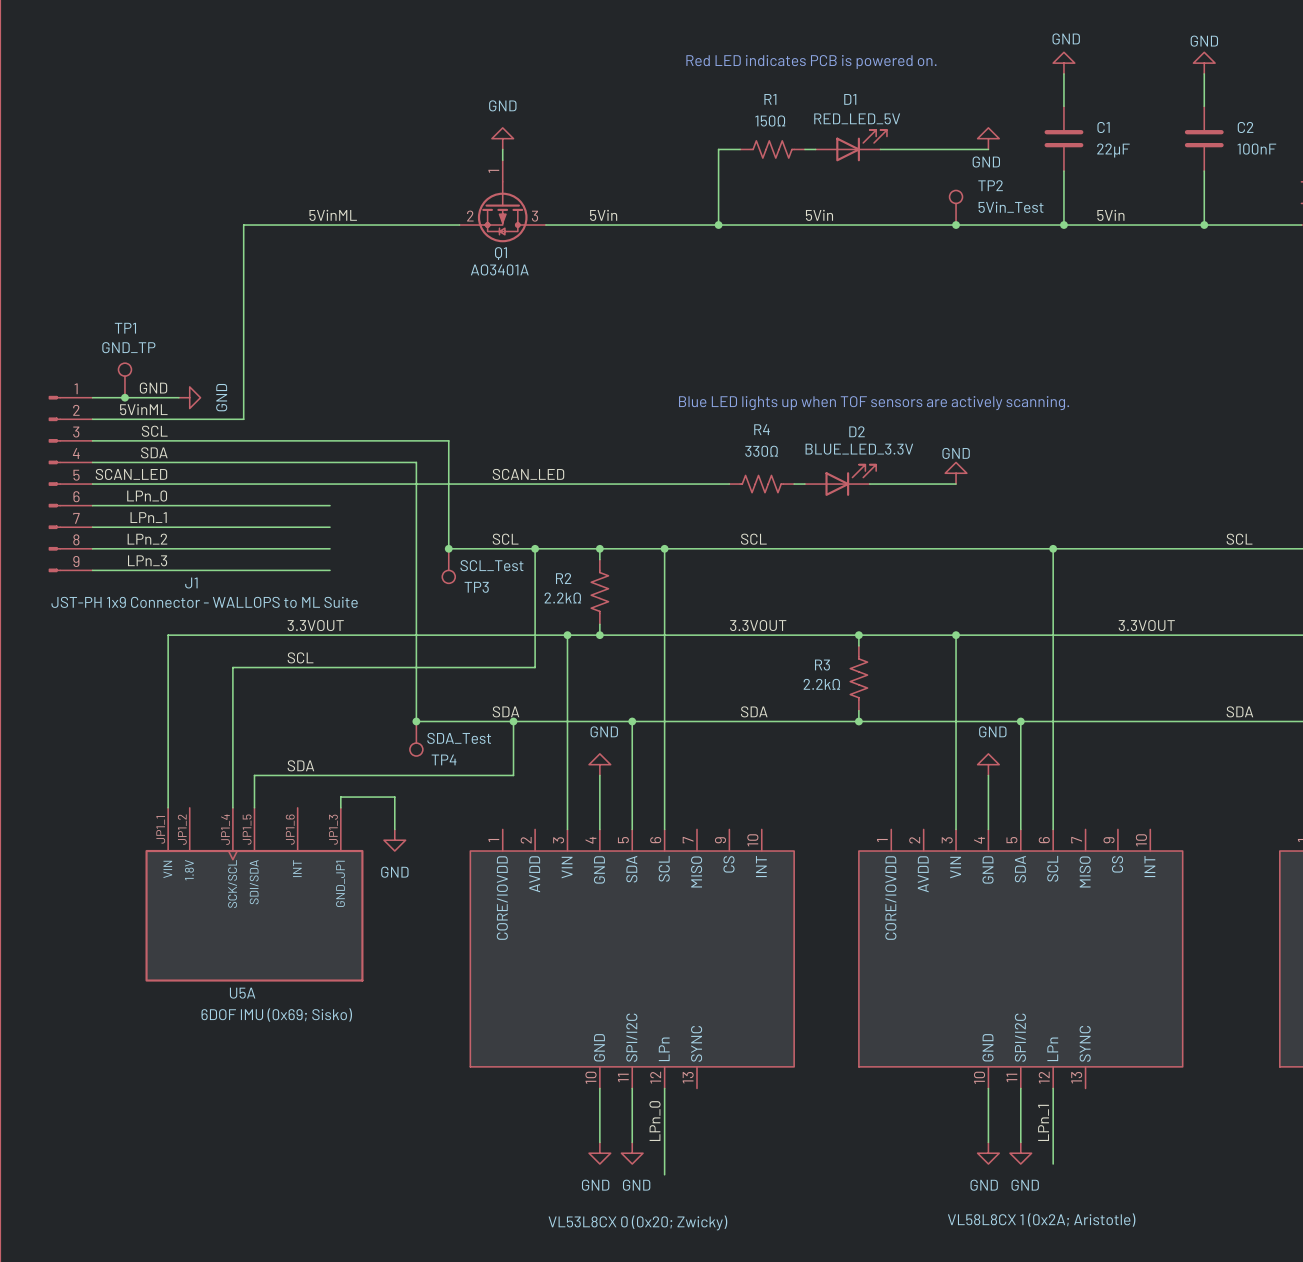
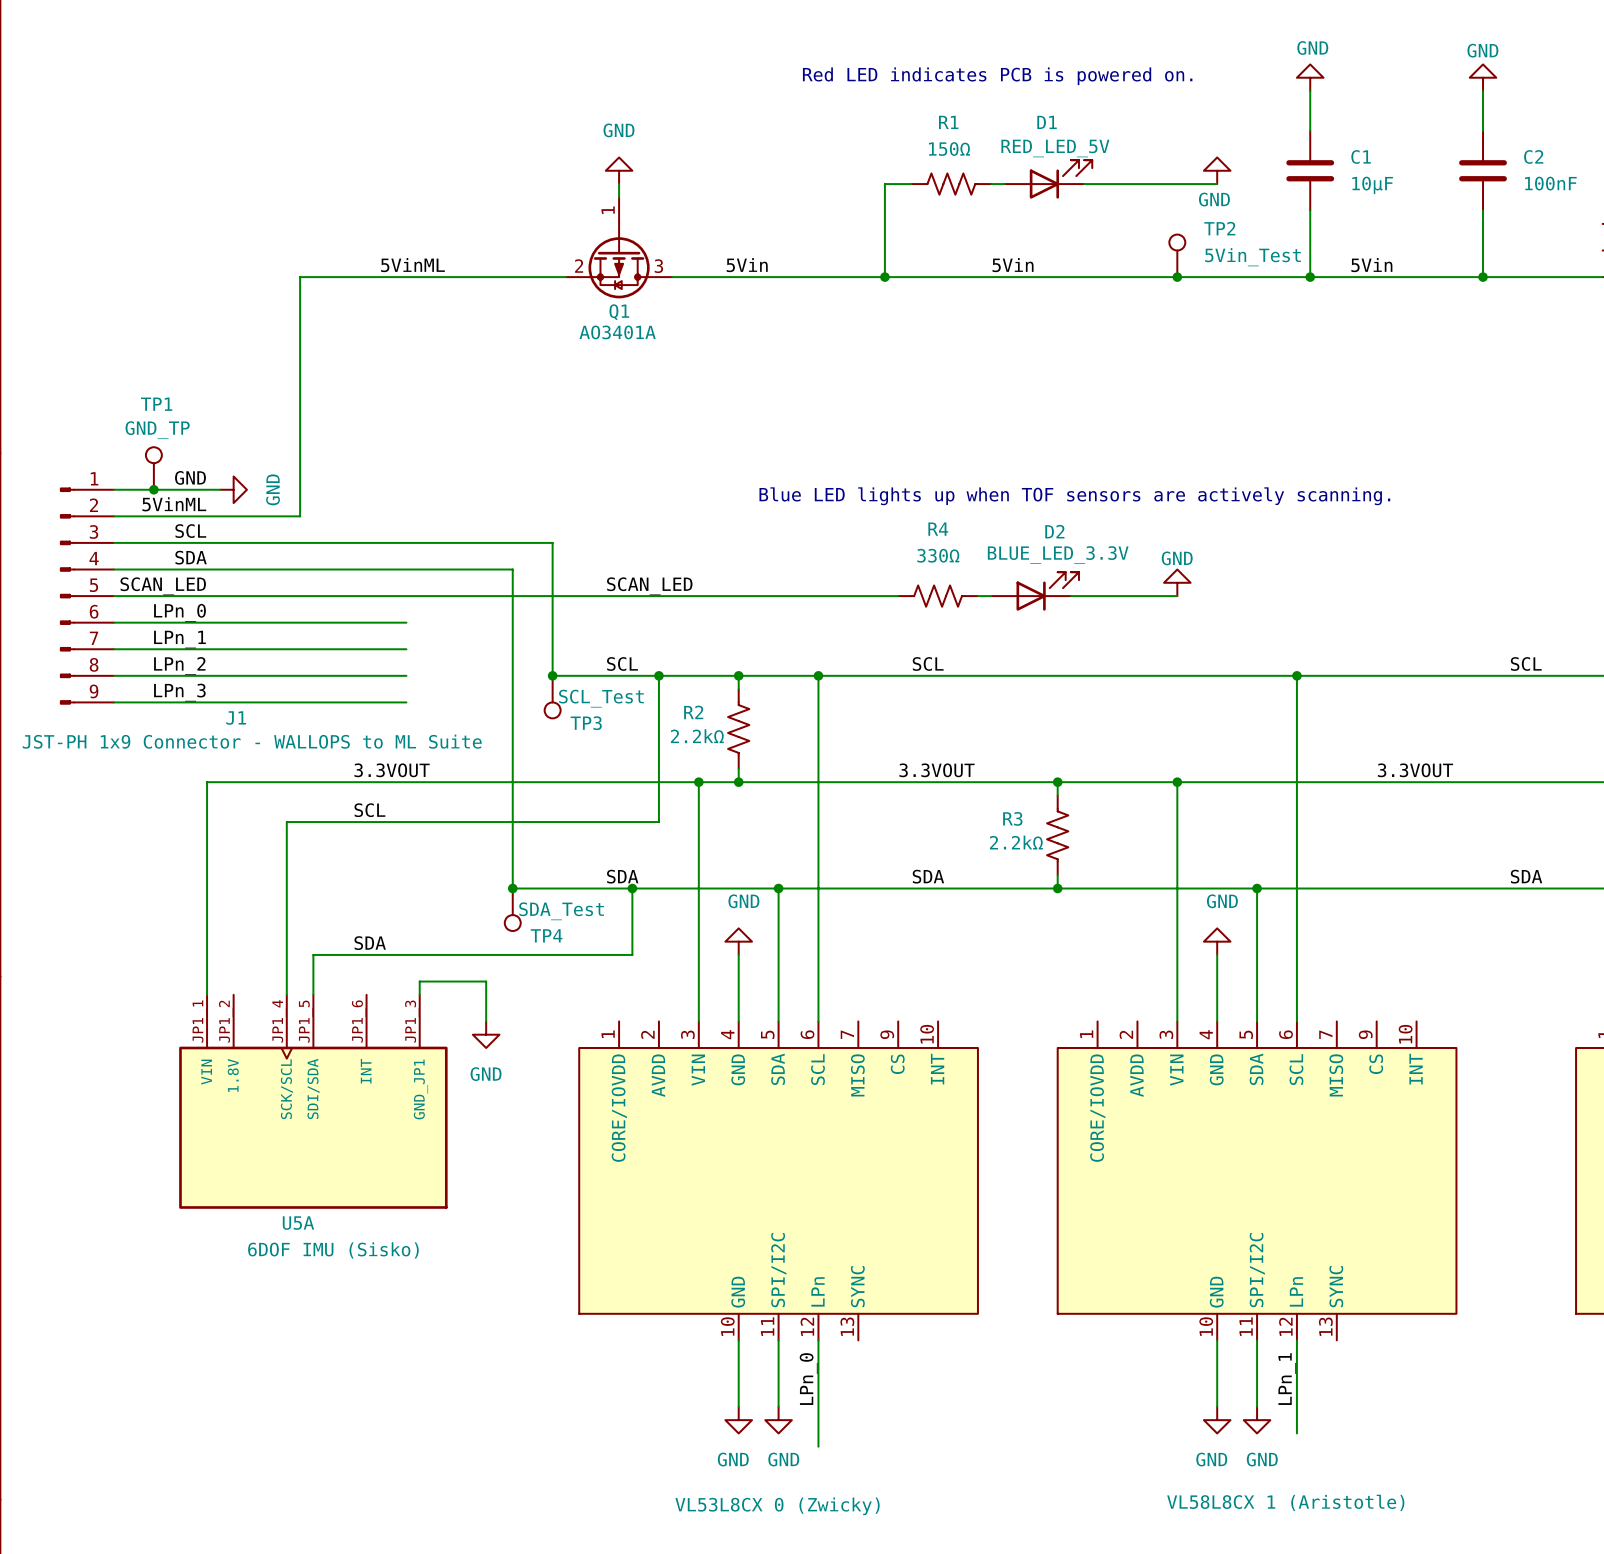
C1 value: 22µF (1113, 150) -> 10µF (1372, 185)
U5A value: 6DOF IMU (0x69; Sisko) (276, 1014) -> 6DOF IMU (Sisko) (333, 1250)
part value: VL58L8CX 1 (0x2A; Aristotle) (1041, 1220) -> VL58L8CX 1 (Aristotle) (1285, 1502)
part value: VL53L8CX 0 (0x20; Zwicky) (637, 1222) -> VL53L8CX 0 (Zwicky) (777, 1506)

